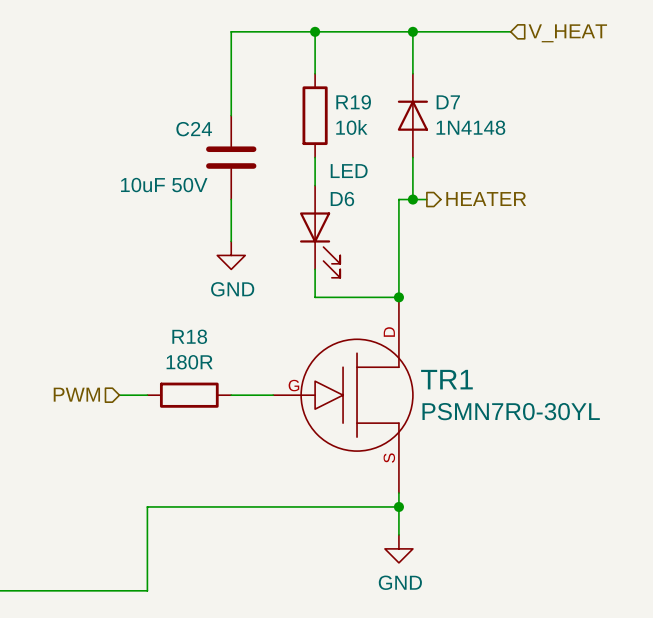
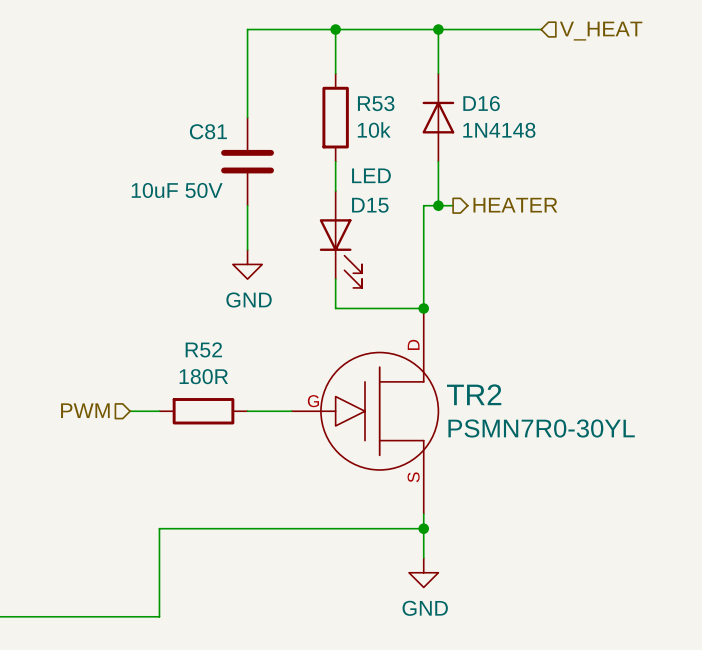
R19 name: R19 (353, 102) -> R53 (376, 103)
D7 name: D7 (448, 102) -> D16 (481, 103)
C24 name: C24 (194, 129) -> C81 (208, 131)
D6 name: D6 (342, 199) -> D15 (370, 205)
R18 name: R18 (189, 336) -> R52 (203, 349)
TR1 name: TR1 (446, 379) -> TR2 (474, 394)

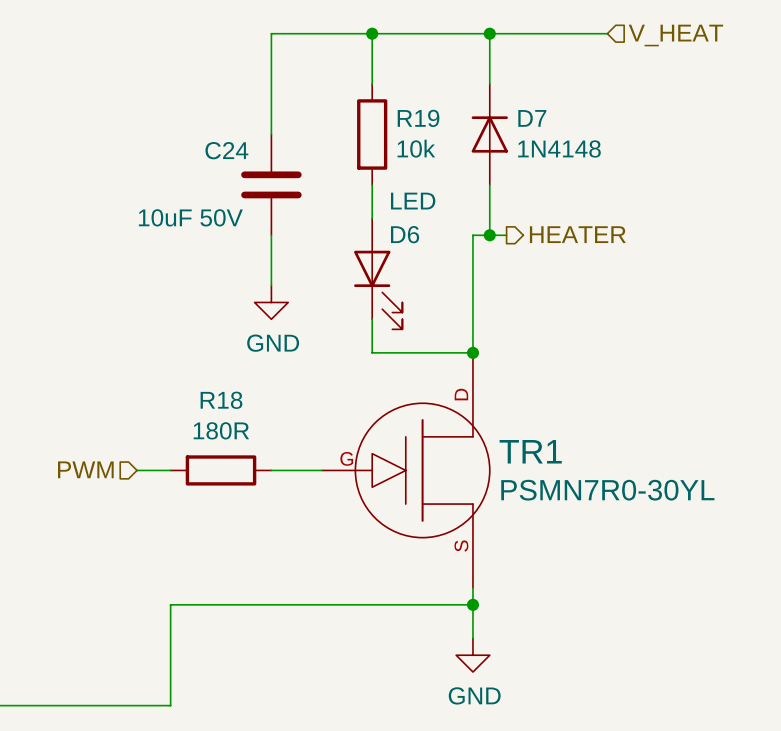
R53 name: R53 (376, 103) -> R19 (418, 118)
D16 name: D16 (481, 103) -> D7 (532, 118)
C81 name: C81 (208, 131) -> C24 (226, 150)
D15 name: D15 (370, 205) -> D6 (405, 234)
R52 name: R52 (203, 349) -> R18 (221, 400)
TR2 name: TR2 (474, 394) -> TR1 (530, 451)

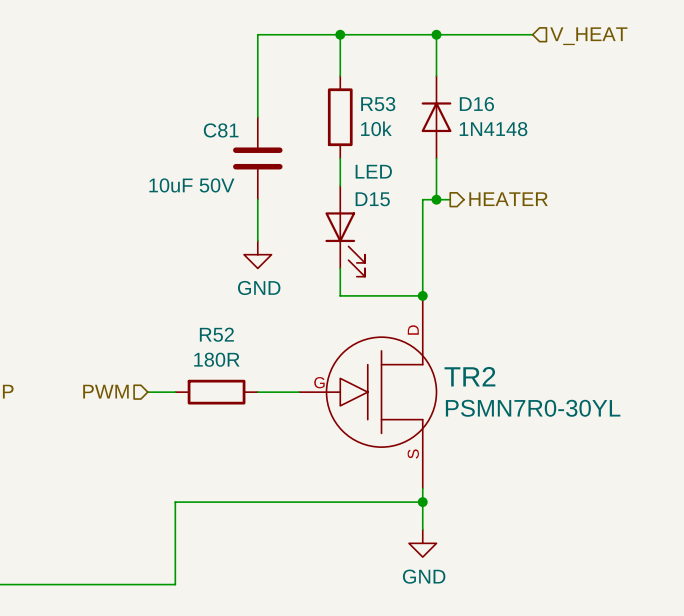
R19 name: R19 (418, 118) -> R53 (378, 104)
D7 name: D7 (532, 118) -> D16 (476, 104)
C24 name: C24 (226, 150) -> C81 (221, 130)
D6 name: D6 (405, 234) -> D15 (372, 199)
R18 name: R18 (221, 400) -> R52 (216, 334)
TR1 name: TR1 (530, 451) -> TR2 (469, 376)

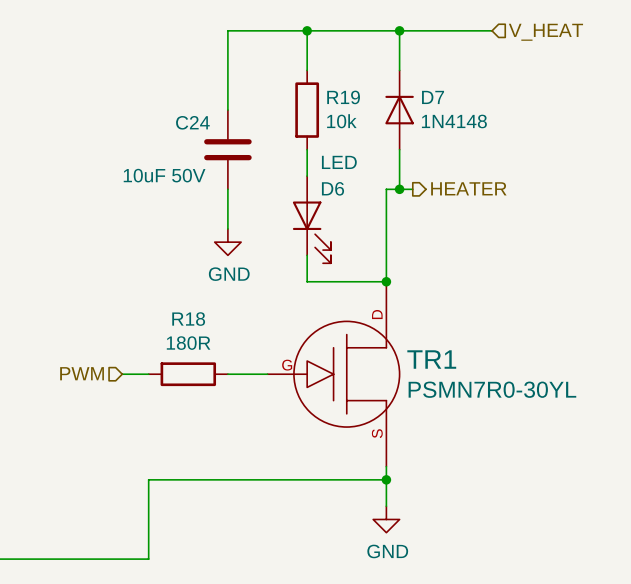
R53 name: R53 (378, 104) -> R19 (343, 97)
D16 name: D16 (476, 104) -> D7 (433, 97)
C81 name: C81 (221, 130) -> C24 (192, 122)
D15 name: D15 (372, 199) -> D6 (332, 188)
R52 name: R52 (216, 334) -> R18 (188, 319)
TR2 name: TR2 (469, 376) -> TR1 (431, 359)

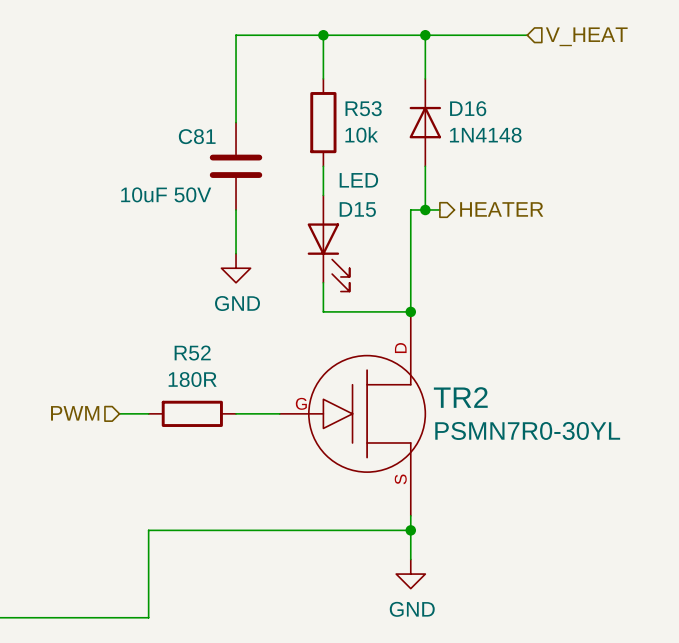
R19 name: R19 (343, 97) -> R53 (363, 108)
D7 name: D7 (433, 97) -> D16 (468, 108)
C24 name: C24 (192, 122) -> C81 (197, 136)
D6 name: D6 (332, 188) -> D15 (357, 209)
R18 name: R18 (188, 319) -> R52 (192, 353)
TR1 name: TR1 (431, 359) -> TR2 (460, 397)

